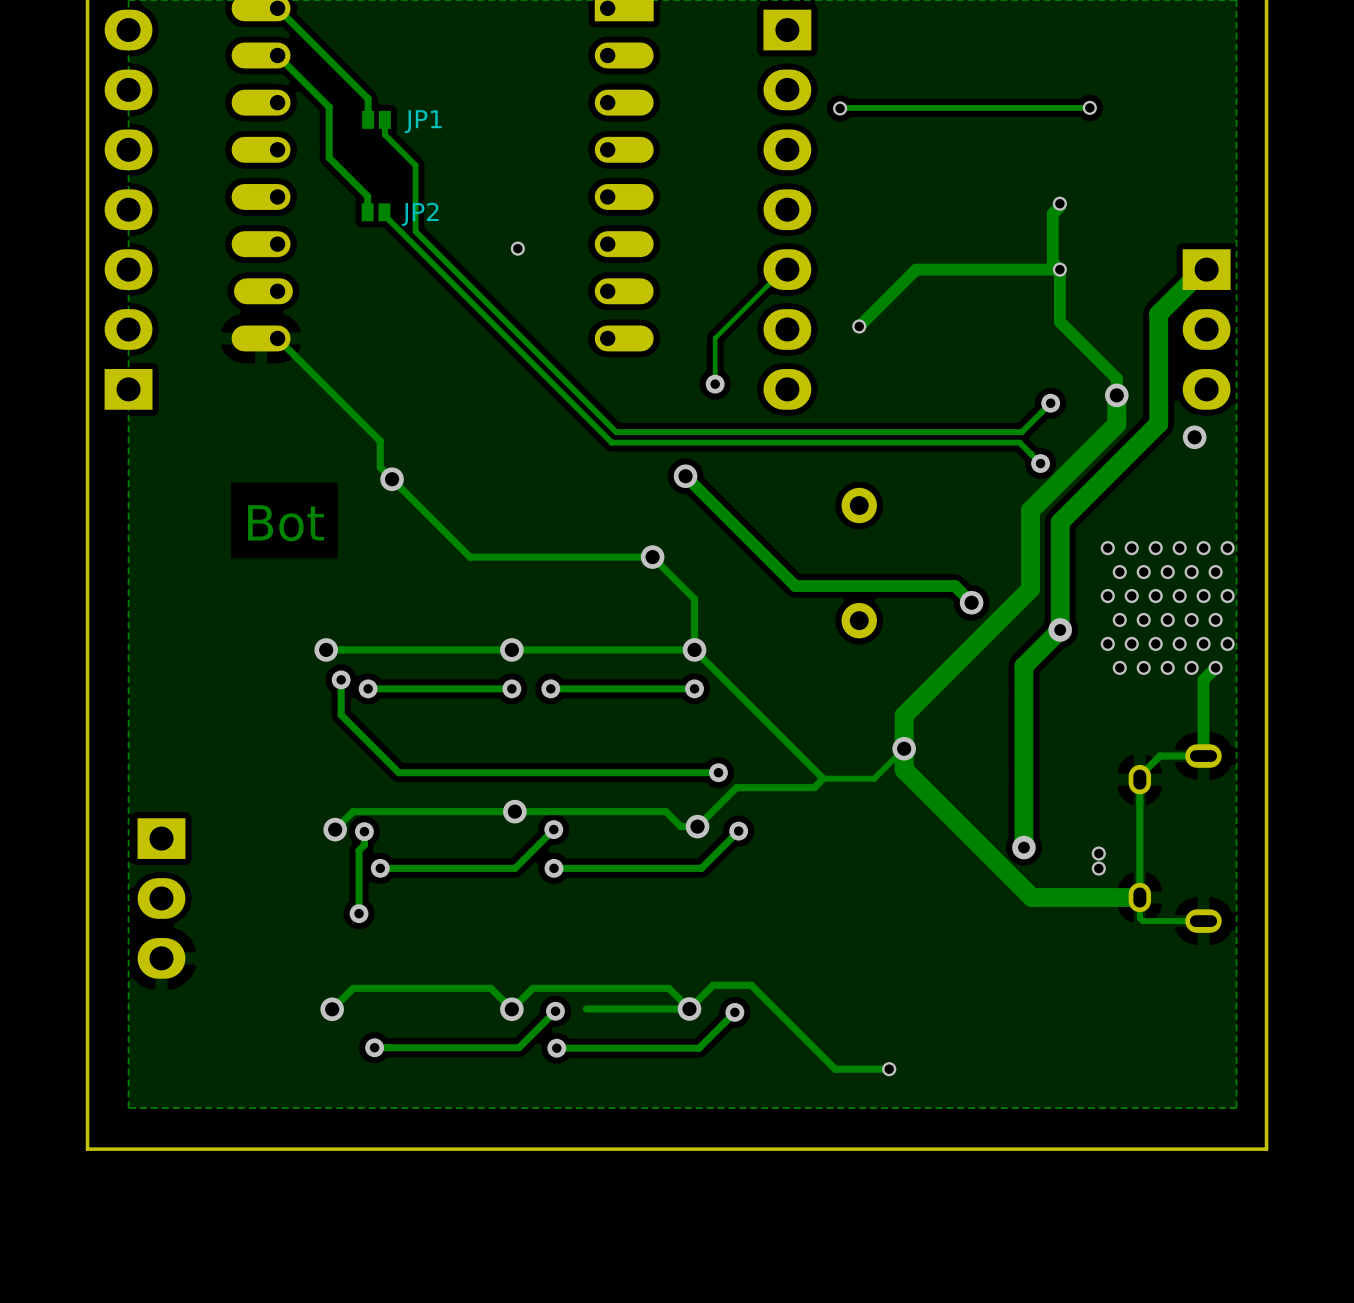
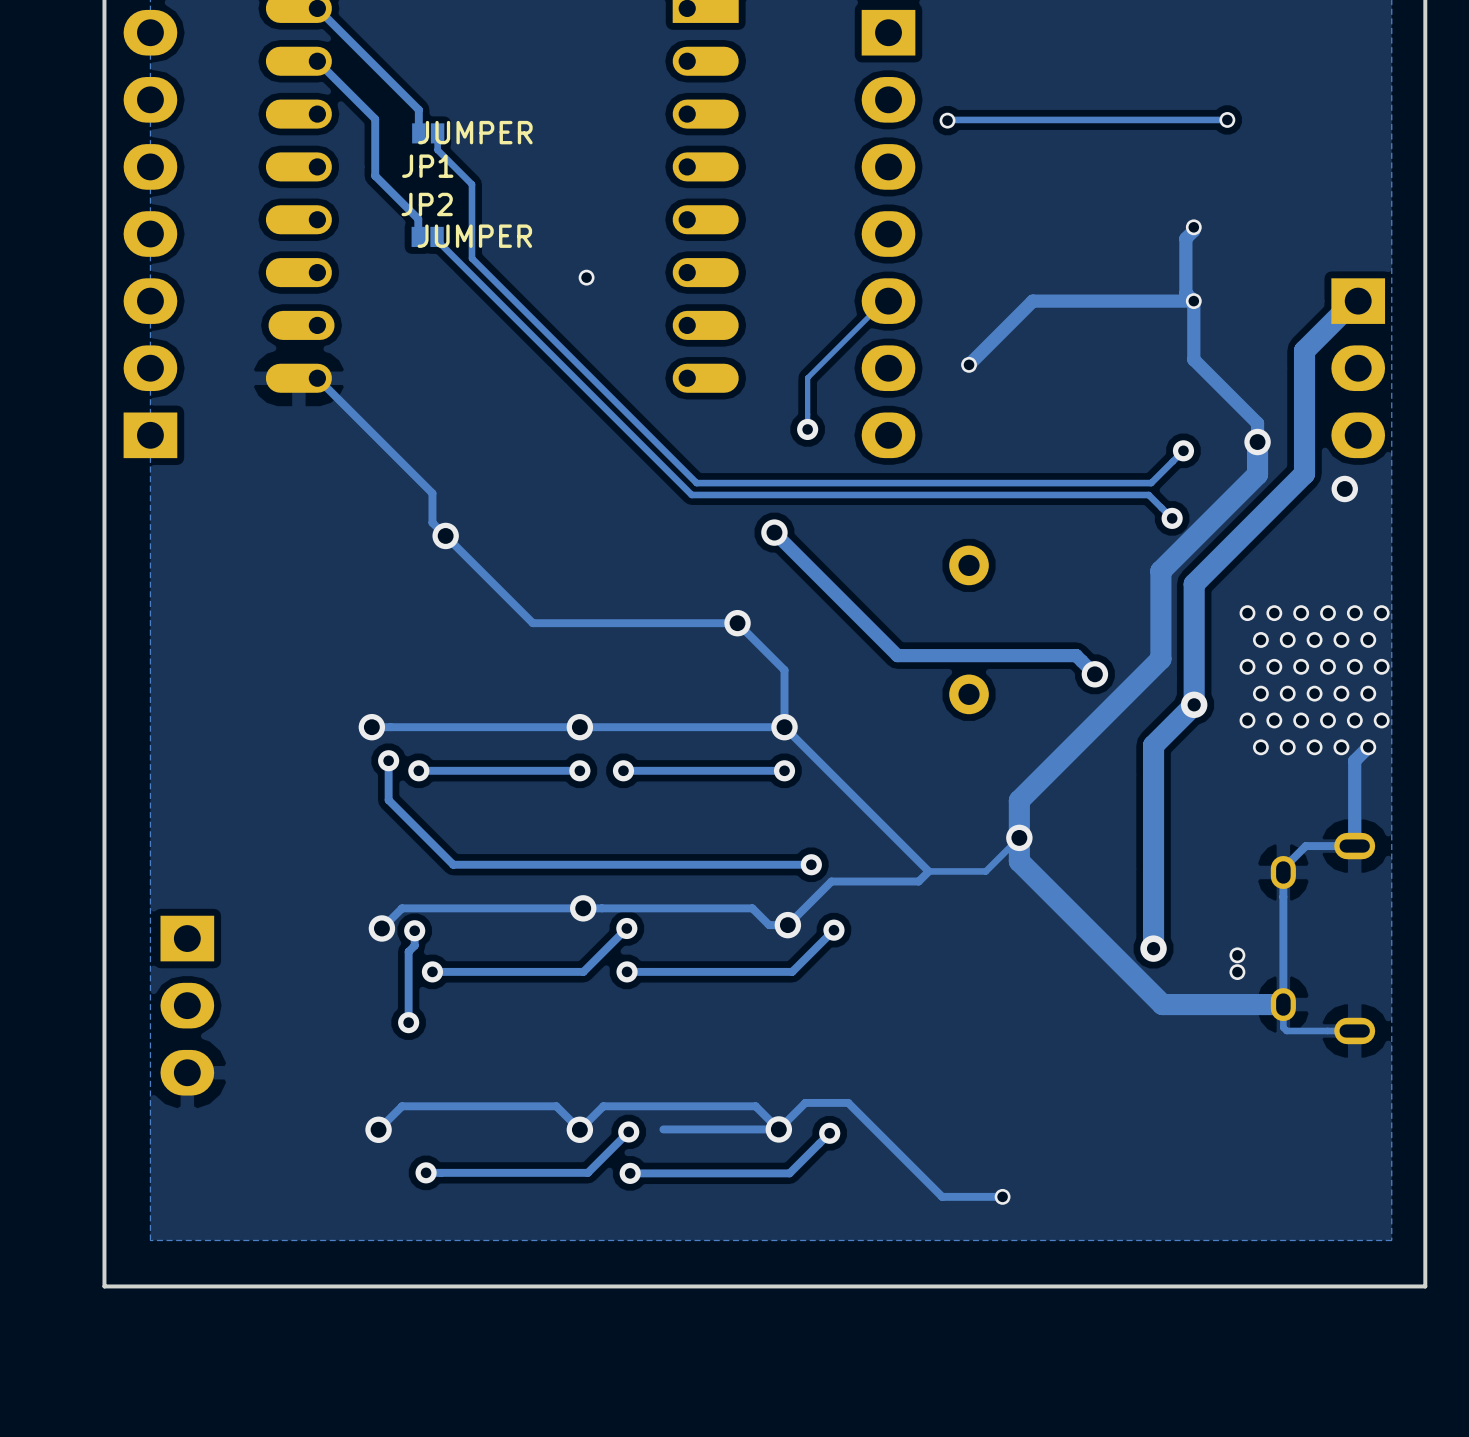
JP1 value: none -> JUMPER (475, 132)
JP1 name position: JP1 (423, 121) -> JP1 (427, 166)
JP2 value: none -> JUMPER (474, 236)
JP2 name position: JP2 (420, 214) -> JP2 (427, 204)
text: Bot (286, 523) -> none

